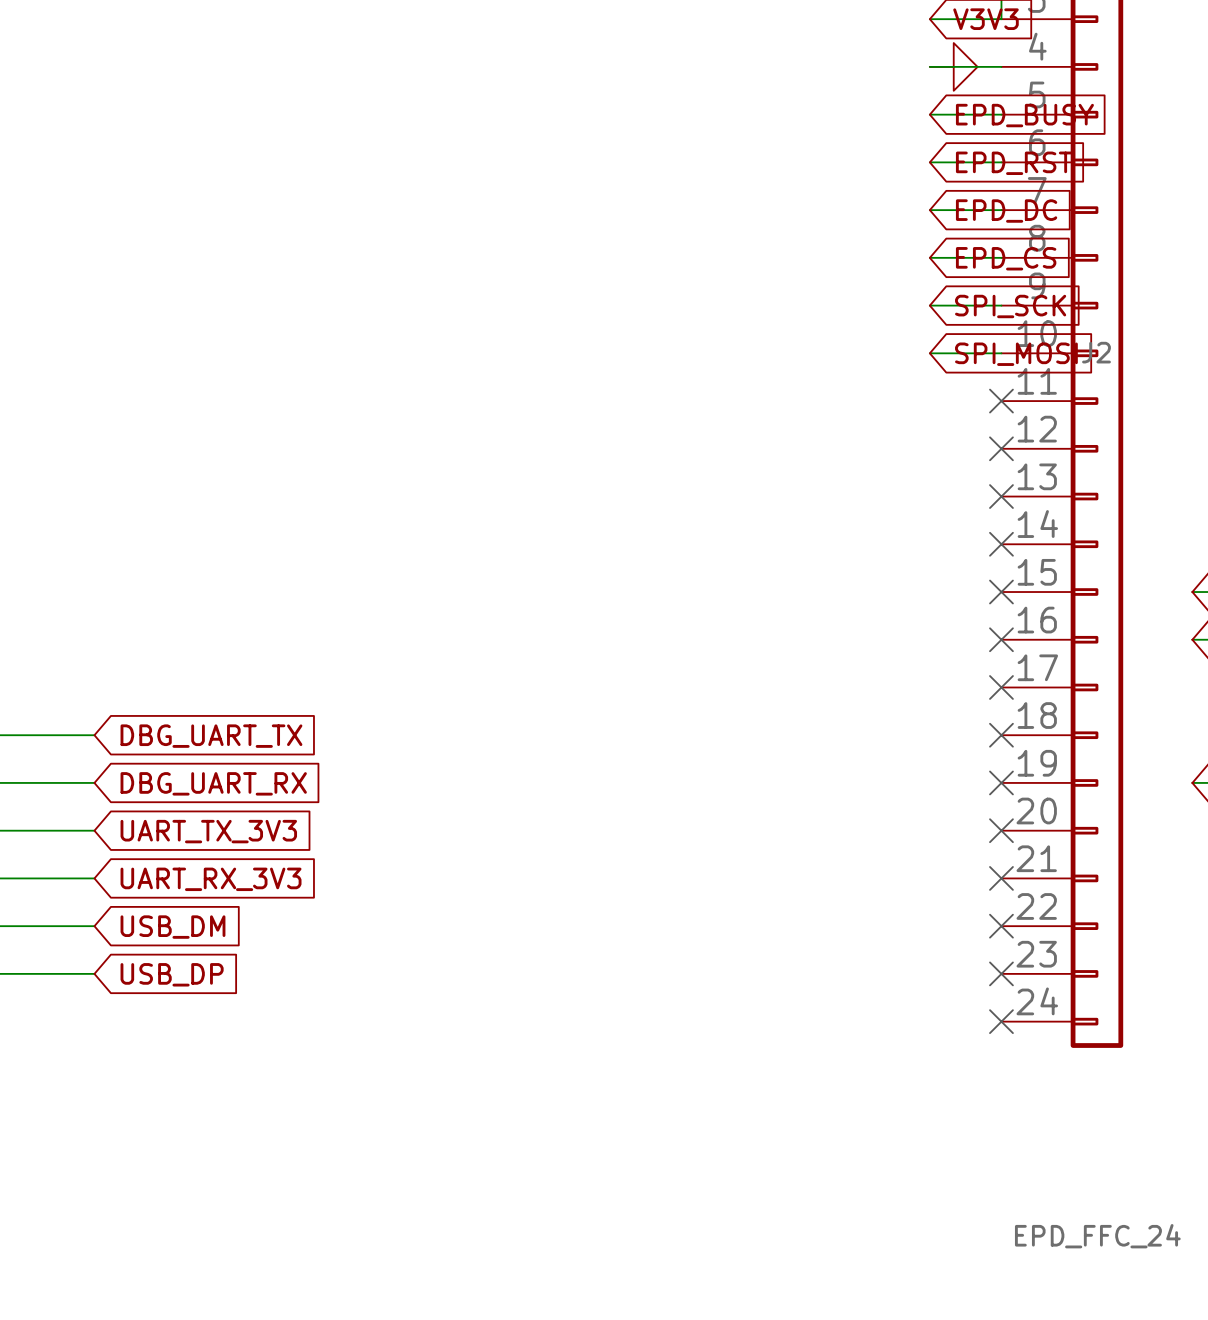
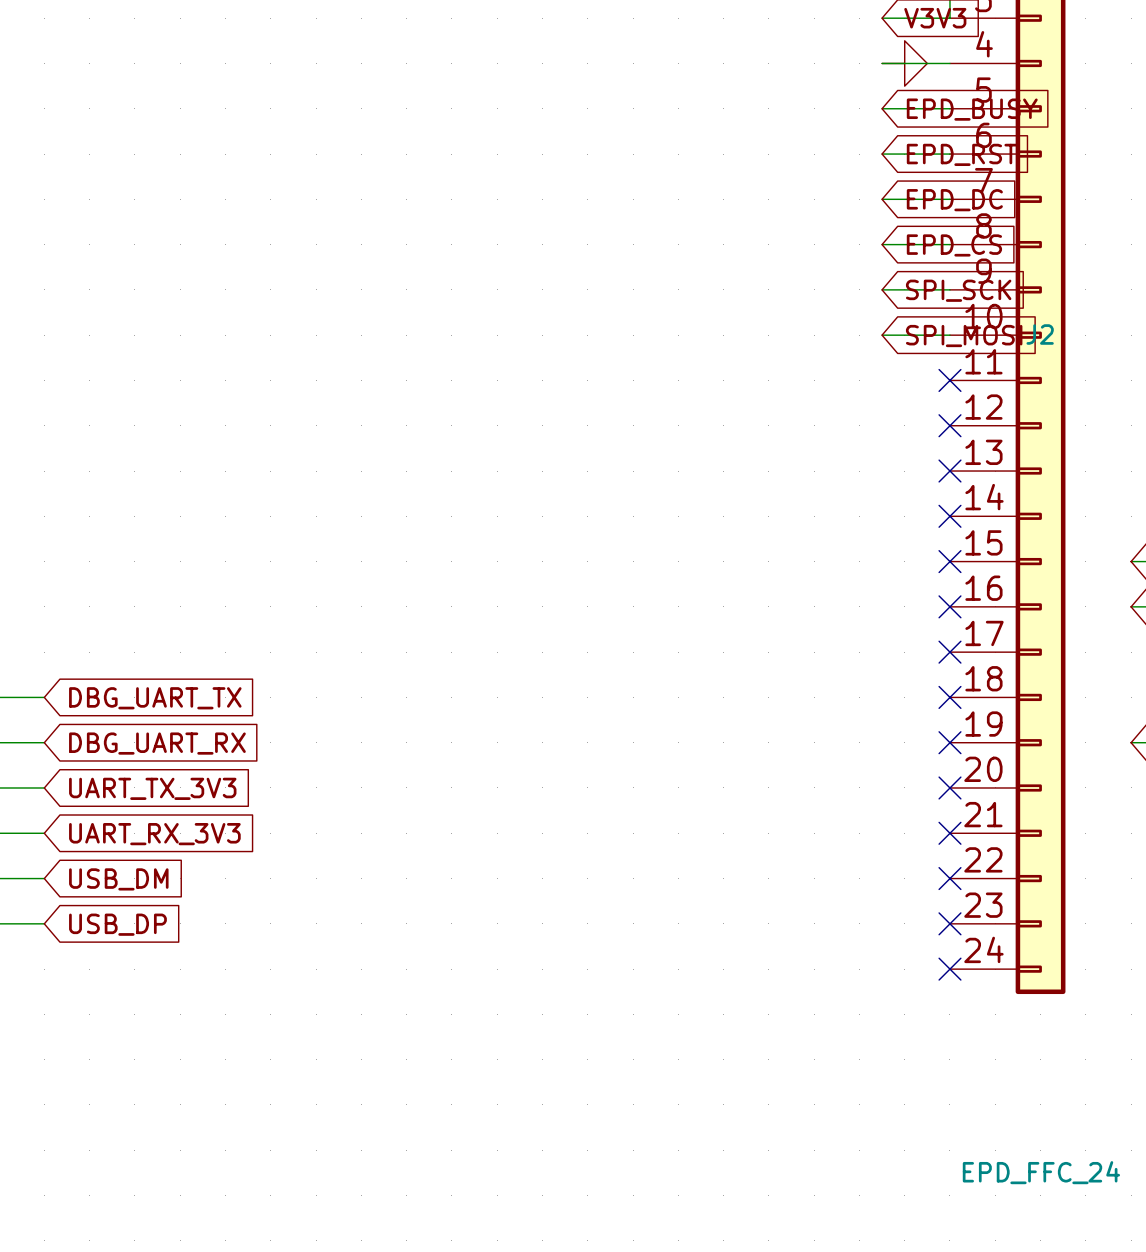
wire: (46, 735) (94, 735) -> none
global label position: DBG_UART_TX (211, 736) -> DBG_UART_TX (155, 698)
wire: (46, 782) (94, 782) -> none
global label position: DBG_UART_RX (213, 783) -> DBG_UART_RX (157, 743)
wire: (46, 830) (94, 830) -> none
global label position: UART_TX_3V3 (208, 831) -> UART_TX_3V3 (152, 788)
wire: (46, 878) (94, 878) -> none
global label position: UART_RX_3V3 (211, 879) -> UART_RX_3V3 (154, 834)
wire: (46, 926) (94, 926) -> none
global label position: USB_DM (172, 927) -> USB_DM (118, 879)
wire: (46, 973) (94, 973) -> none
global label position: USB_DP (172, 974) -> USB_DP (117, 924)

